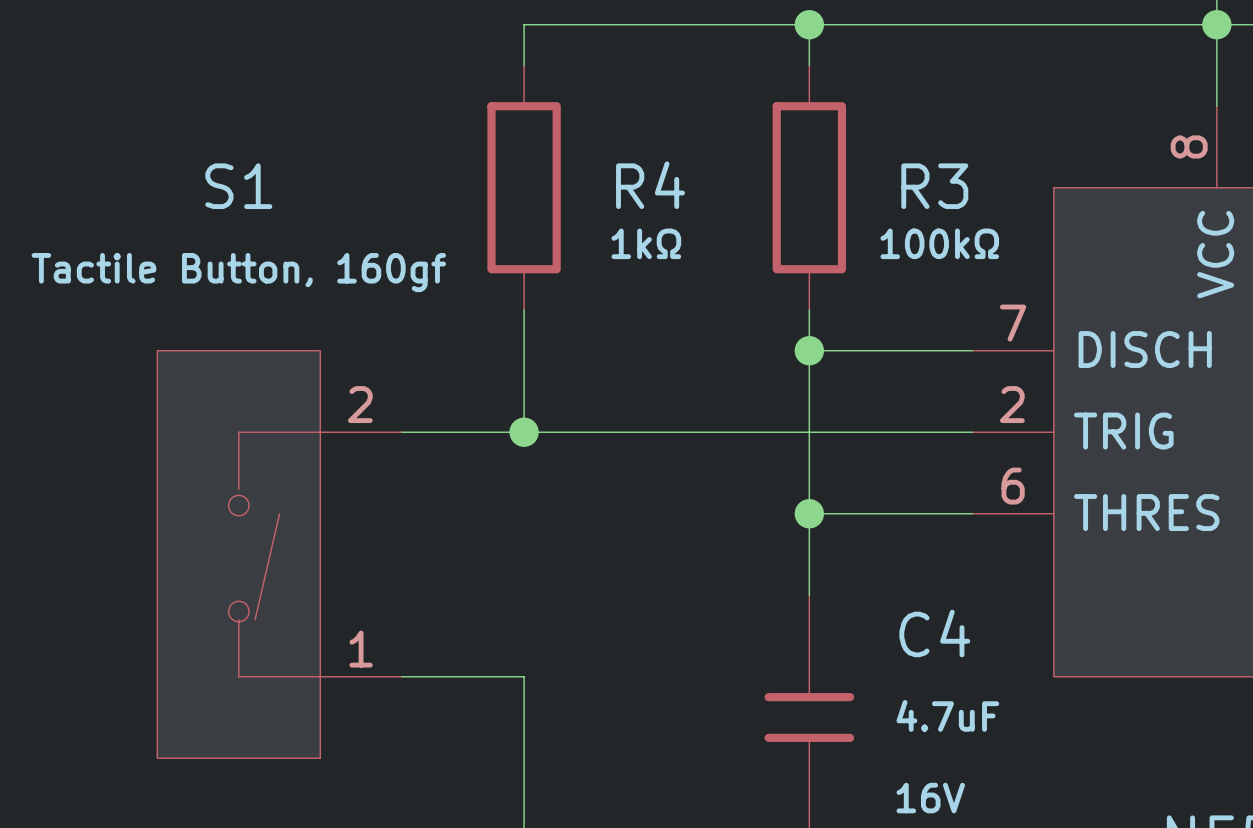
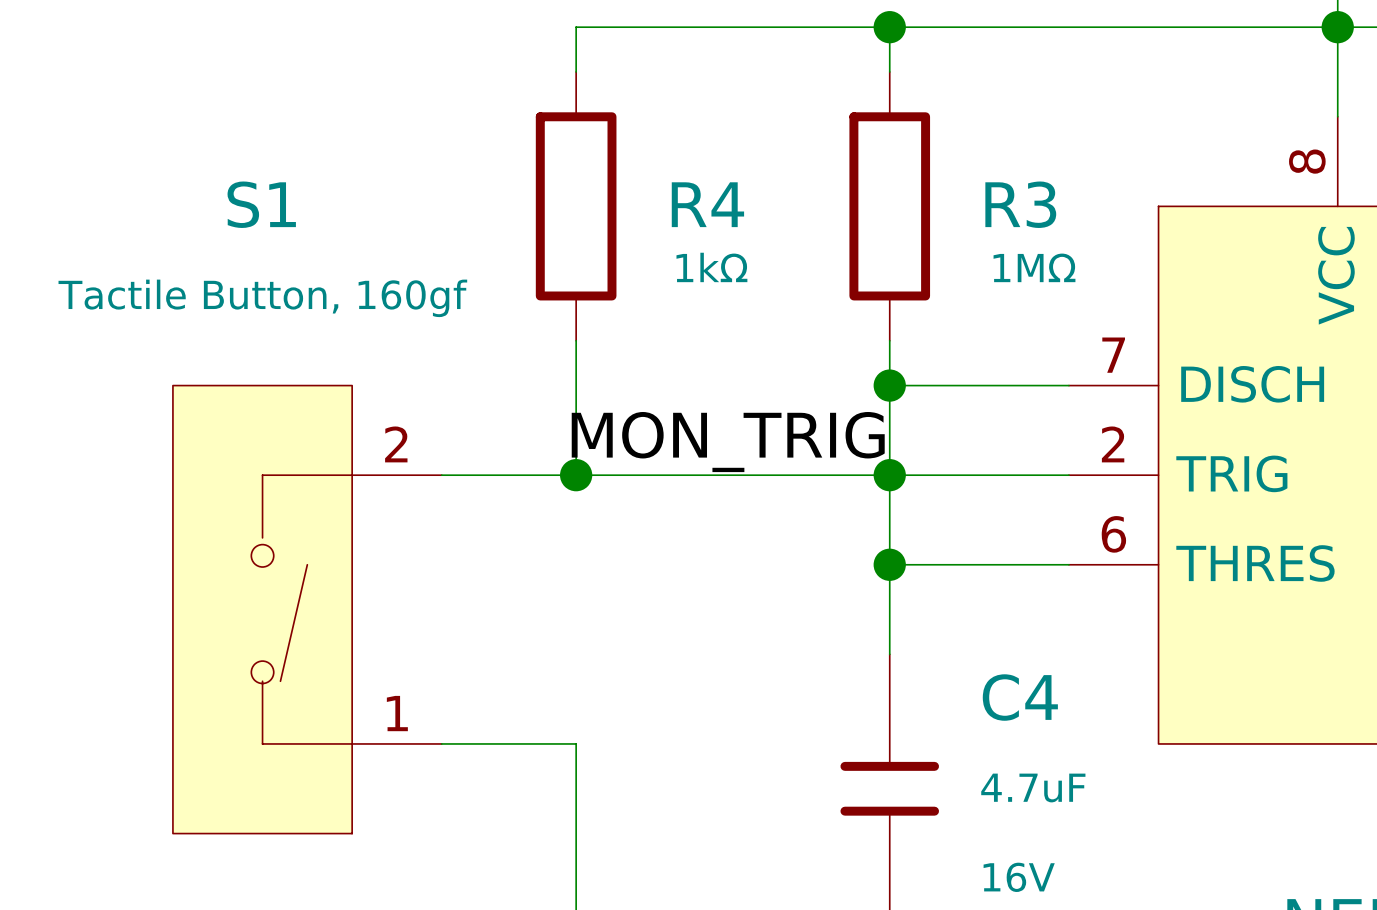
R3 value: 100kΩ (939, 243) -> 1MΩ (1034, 267)
label: none -> MON_TRIG (728, 442)
junction: none -> (889, 475)

